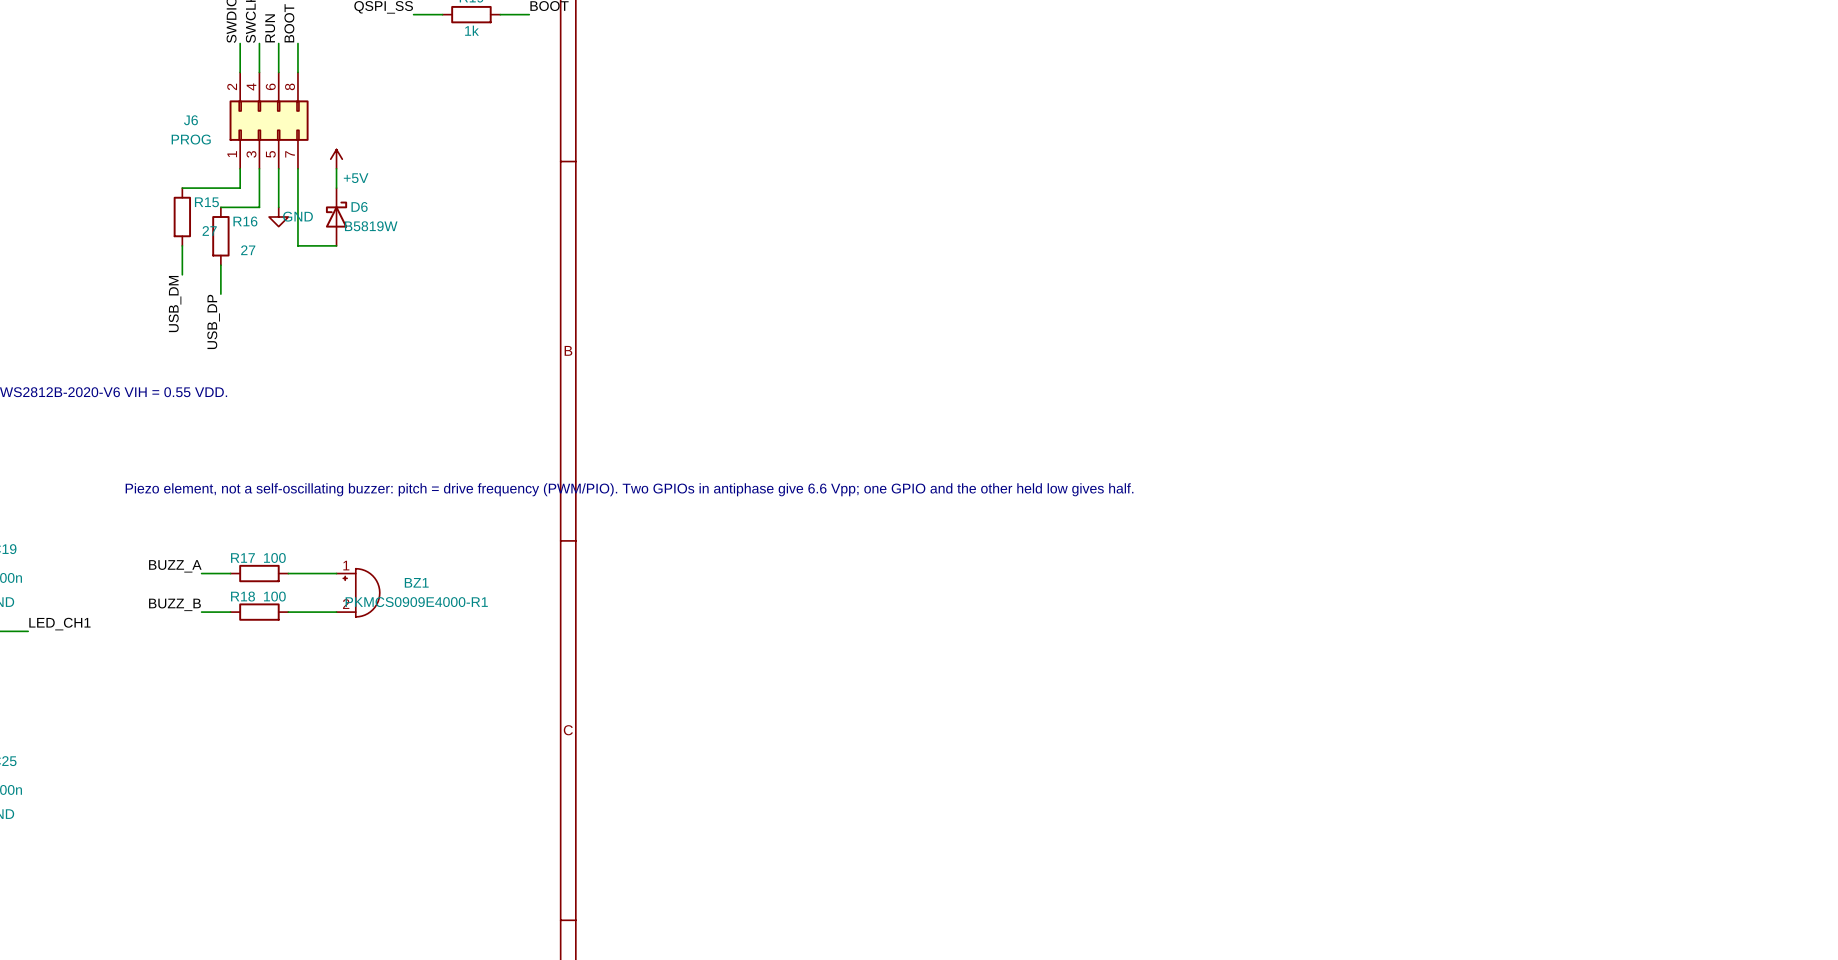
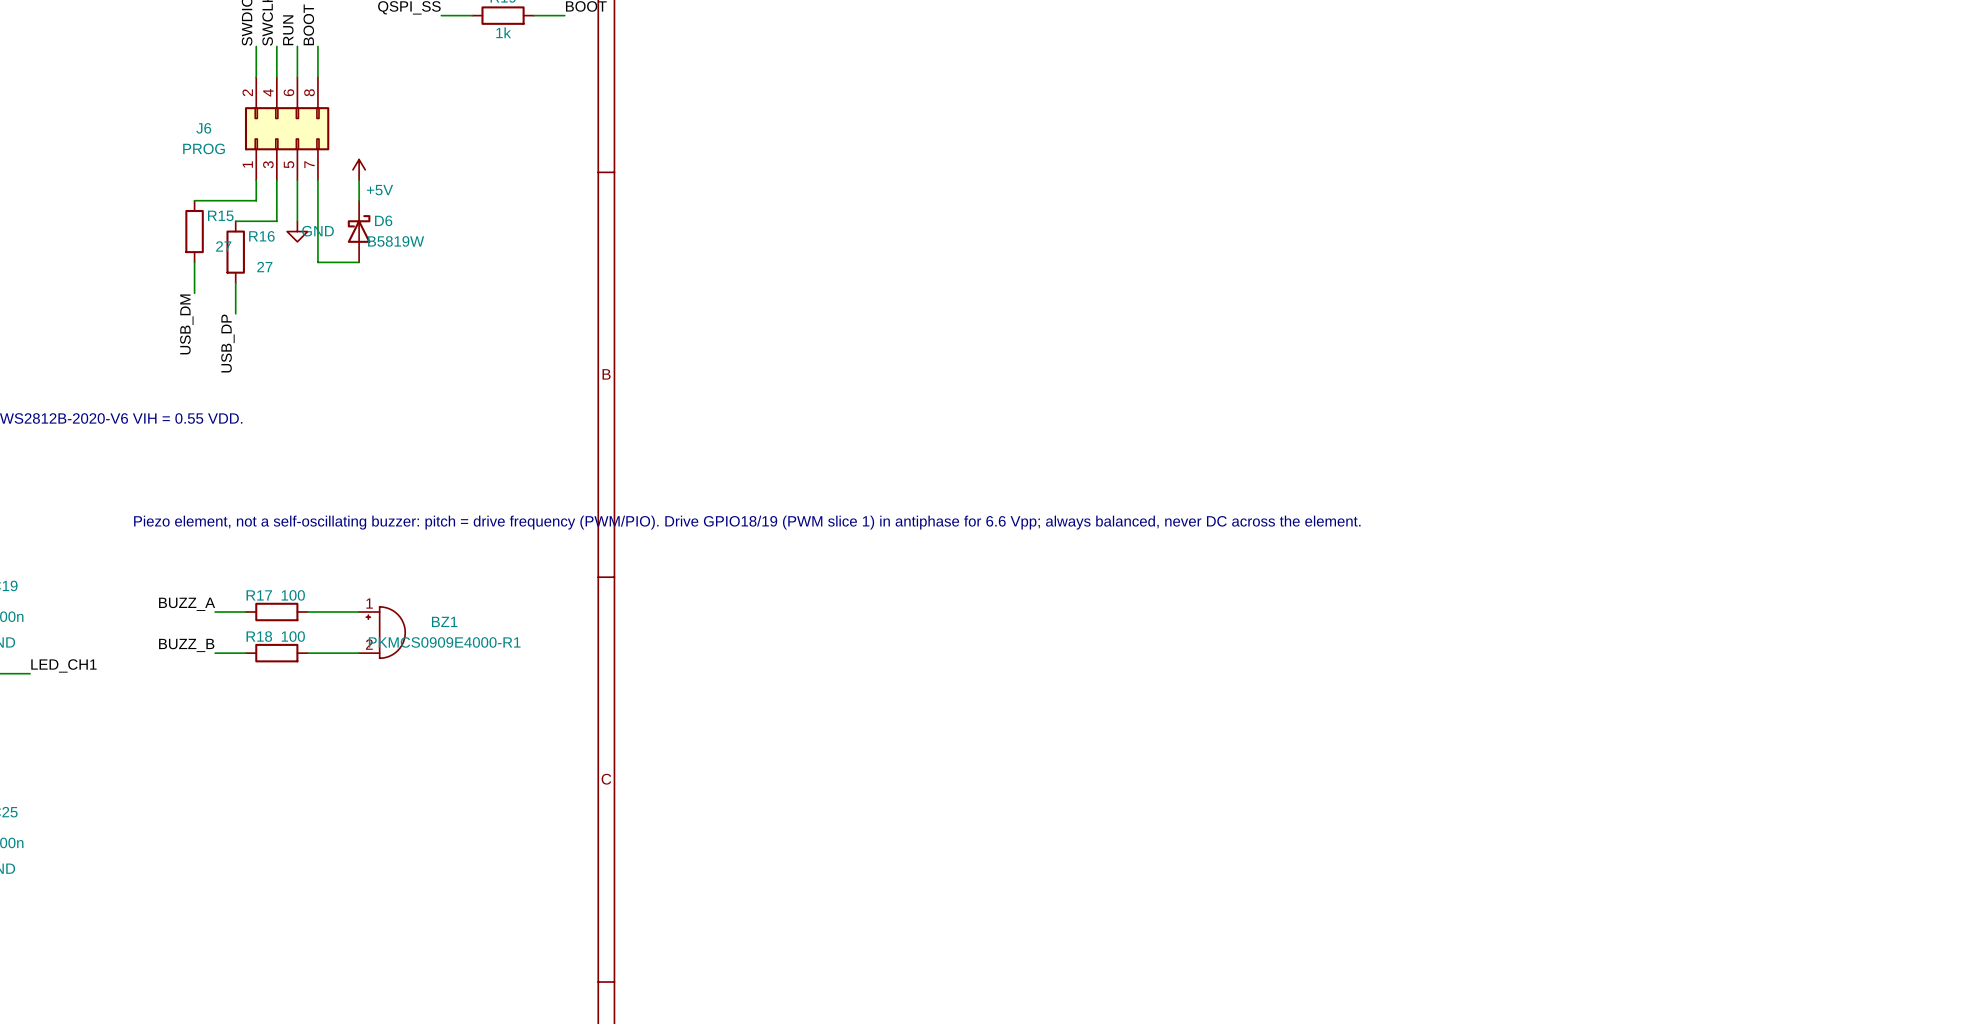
text: Piezo element, not a self-oscillating buzzer: pitch = drive frequency (PWM/PIO). Two GPIOs in antiphase give 6.6 Vpp; one GPIO and the other held low gives half. (629, 489) -> Piezo element, not a self-oscillating buzzer: pitch = drive frequency (PWM/PIO). Drive GPIO18/19 (PWM slice 1) in antiphase for 6.6 Vpp; always balanced, never DC across the element. (747, 522)

